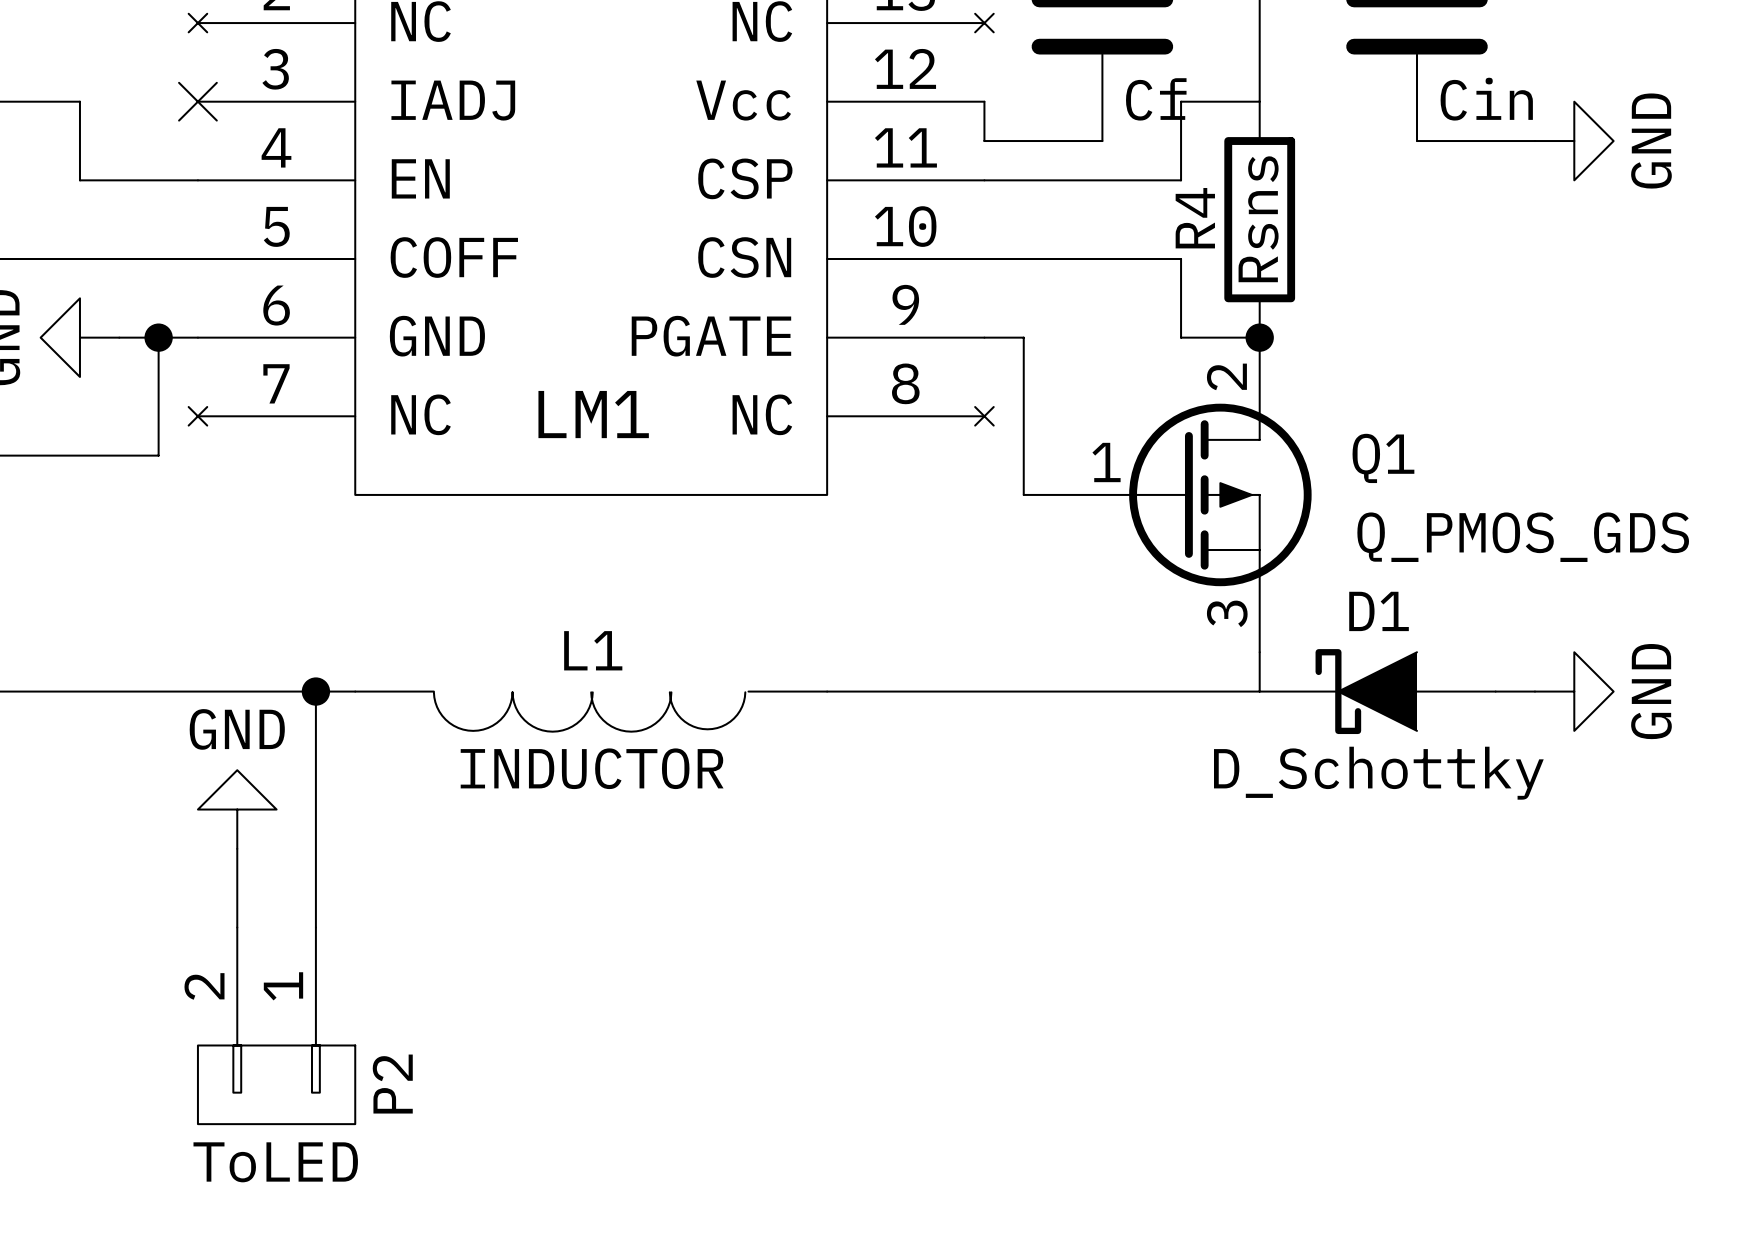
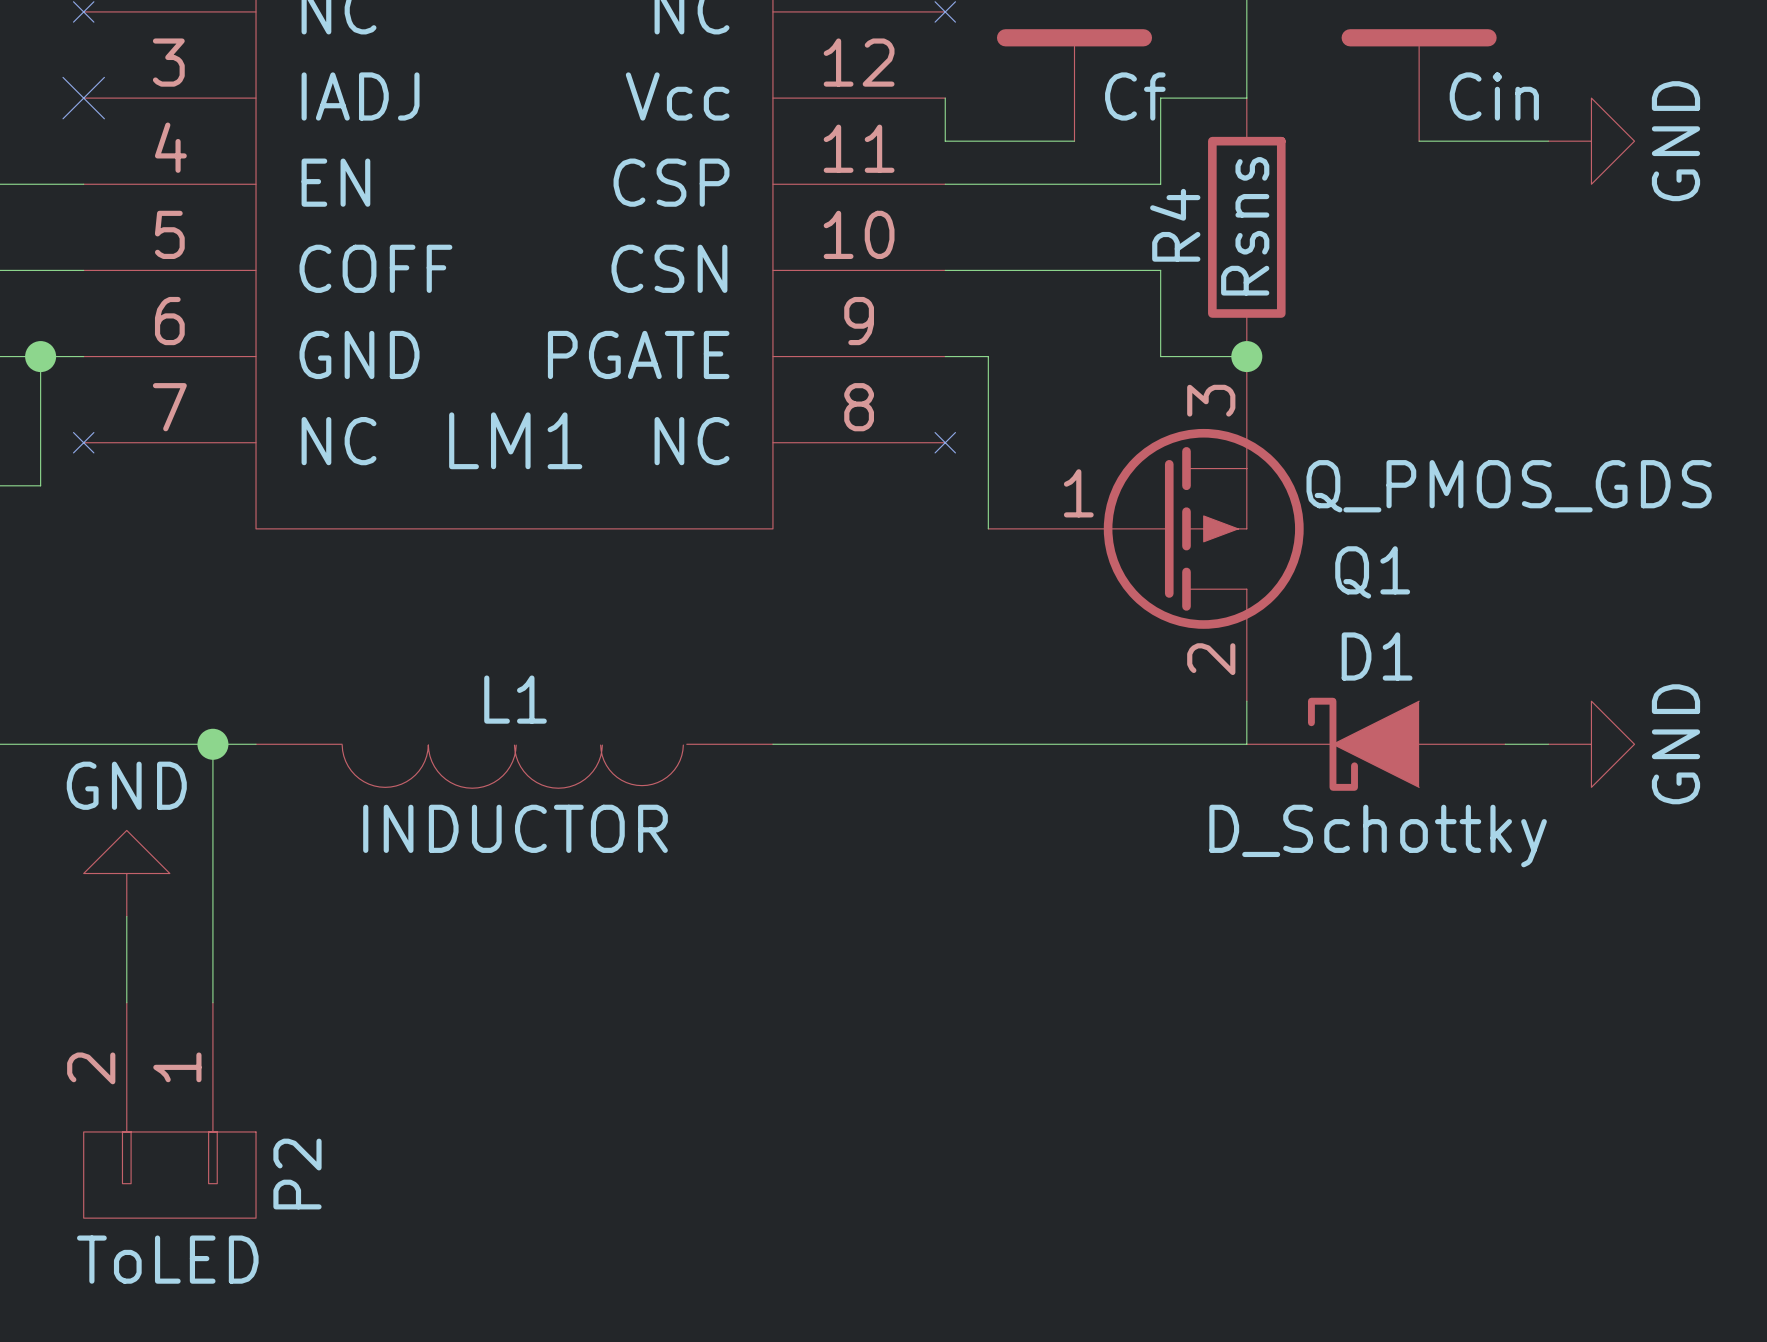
Q1 flip: as is (1220, 494) -> up-down (1203, 528)

